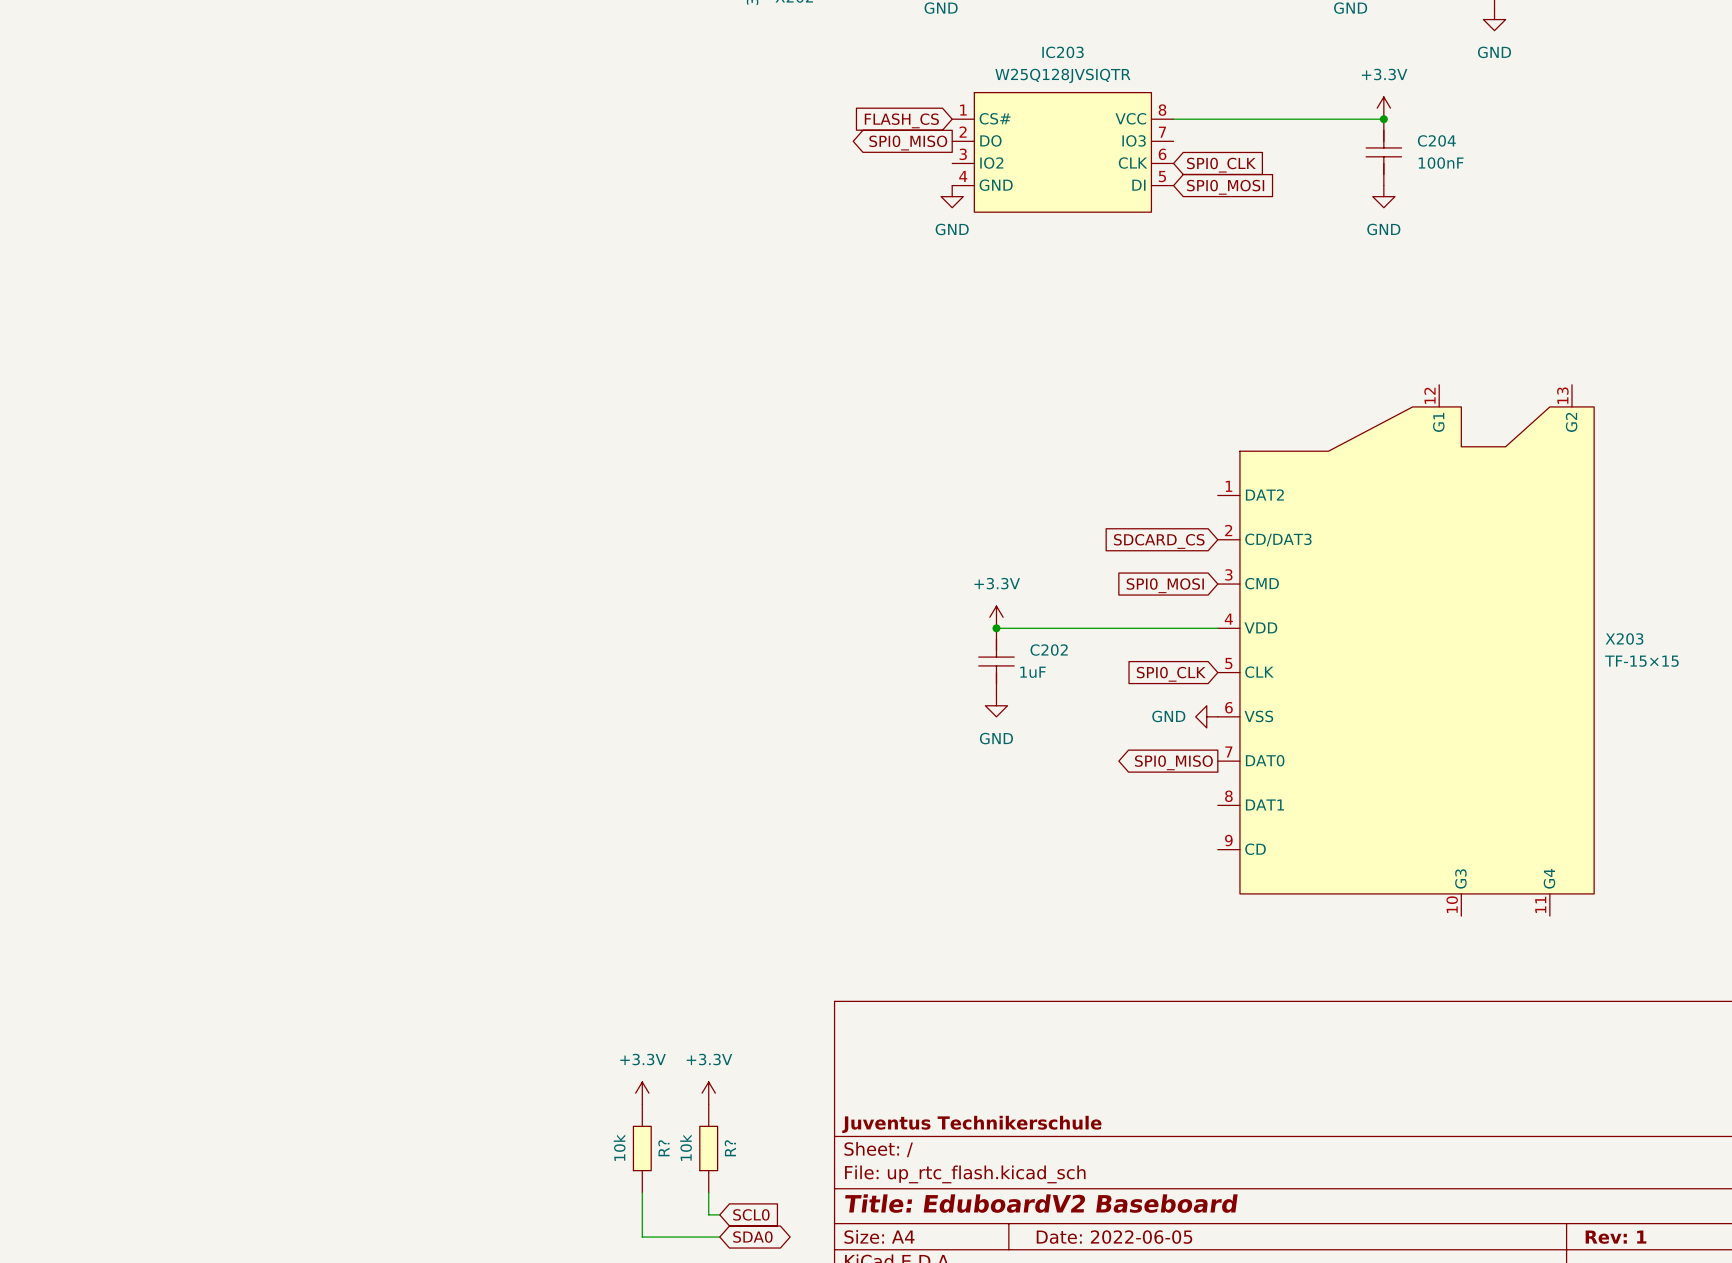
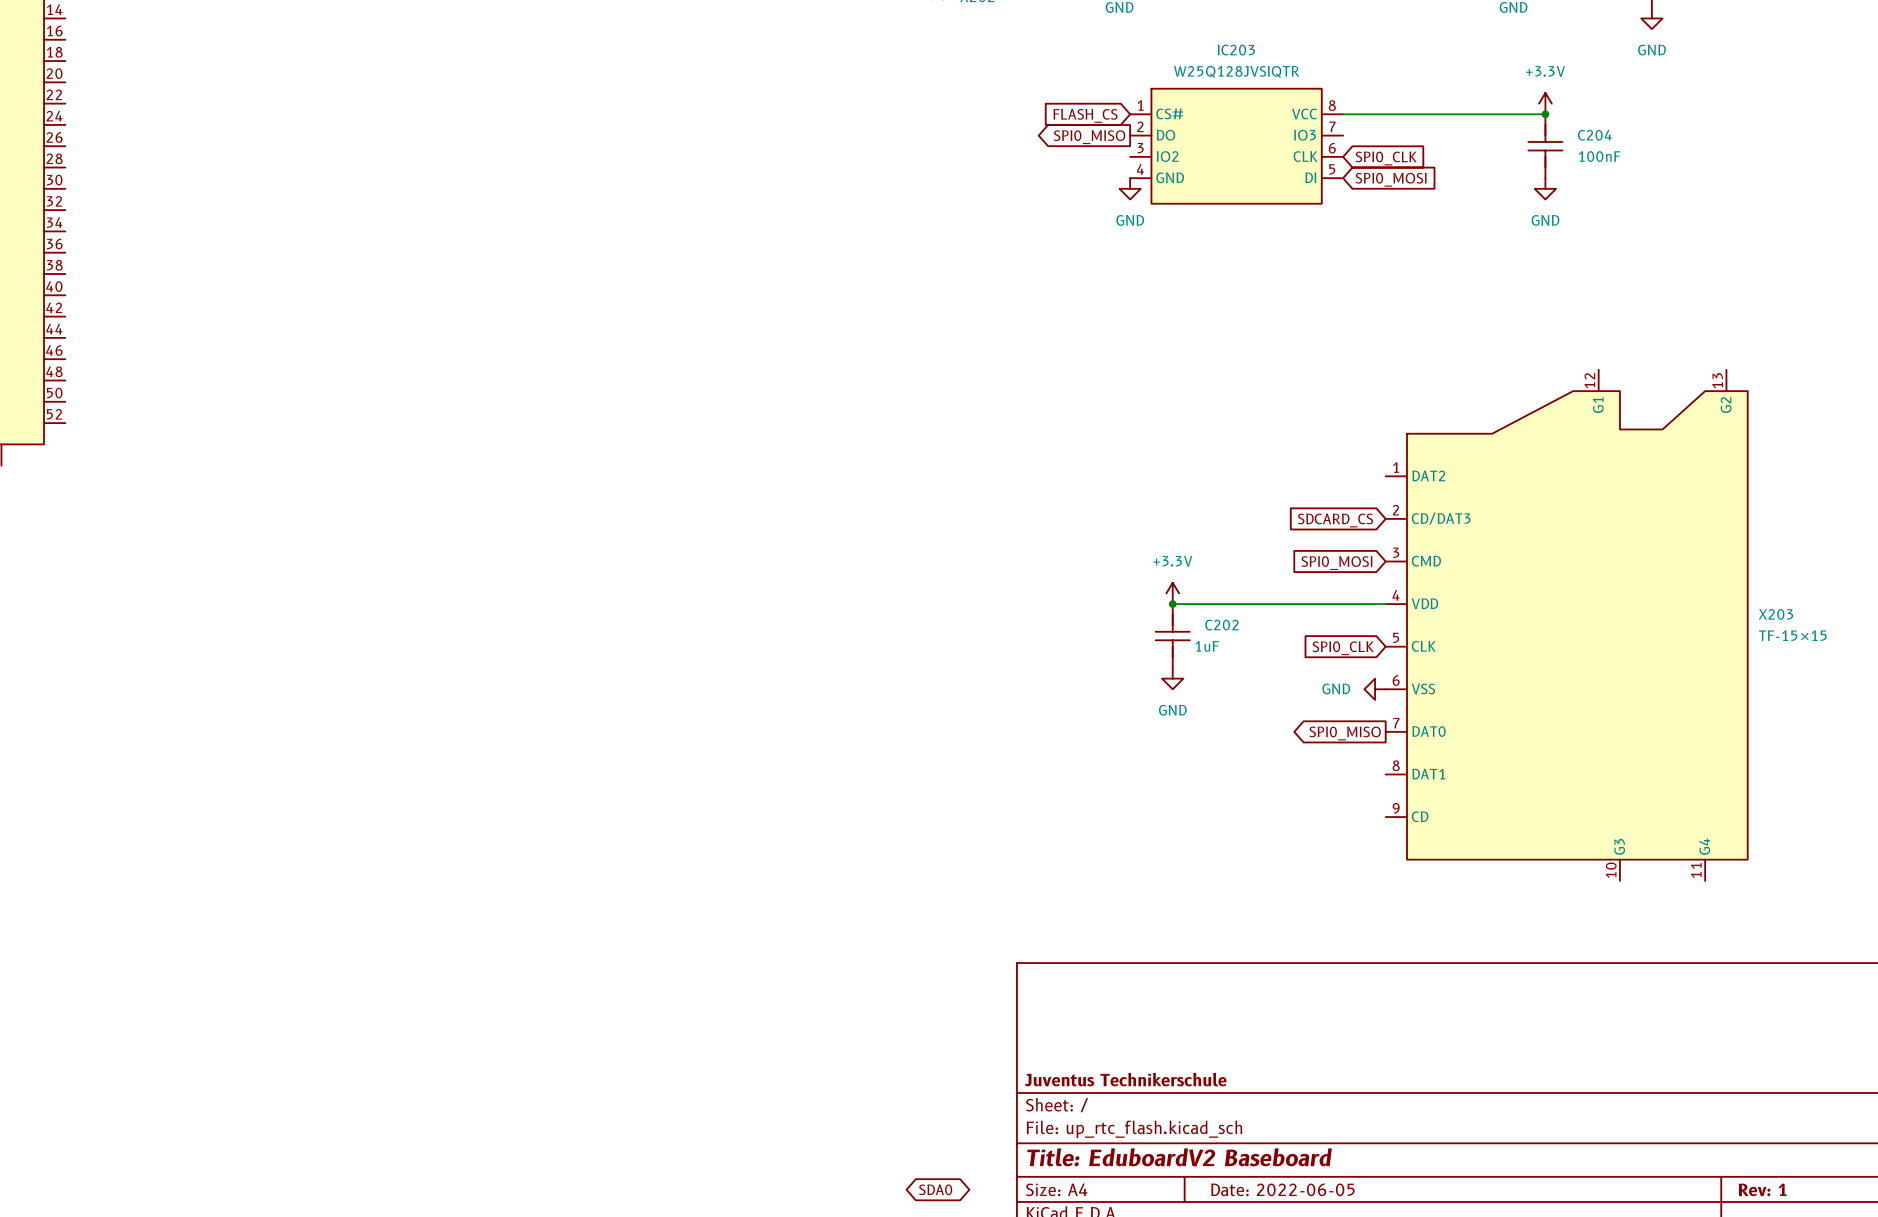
power symbol: +3.3V (642, 1093) -> none
power symbol: +3.3V (708, 1093) -> none
R?: 10k (642, 1148) -> none
R?: 10k (708, 1148) -> none
wire: (642, 1192) (642, 1237) (719, 1237) -> none
wire: (708, 1192) (708, 1214) (719, 1214) -> none
global label: SCL0 (751, 1214) -> none

